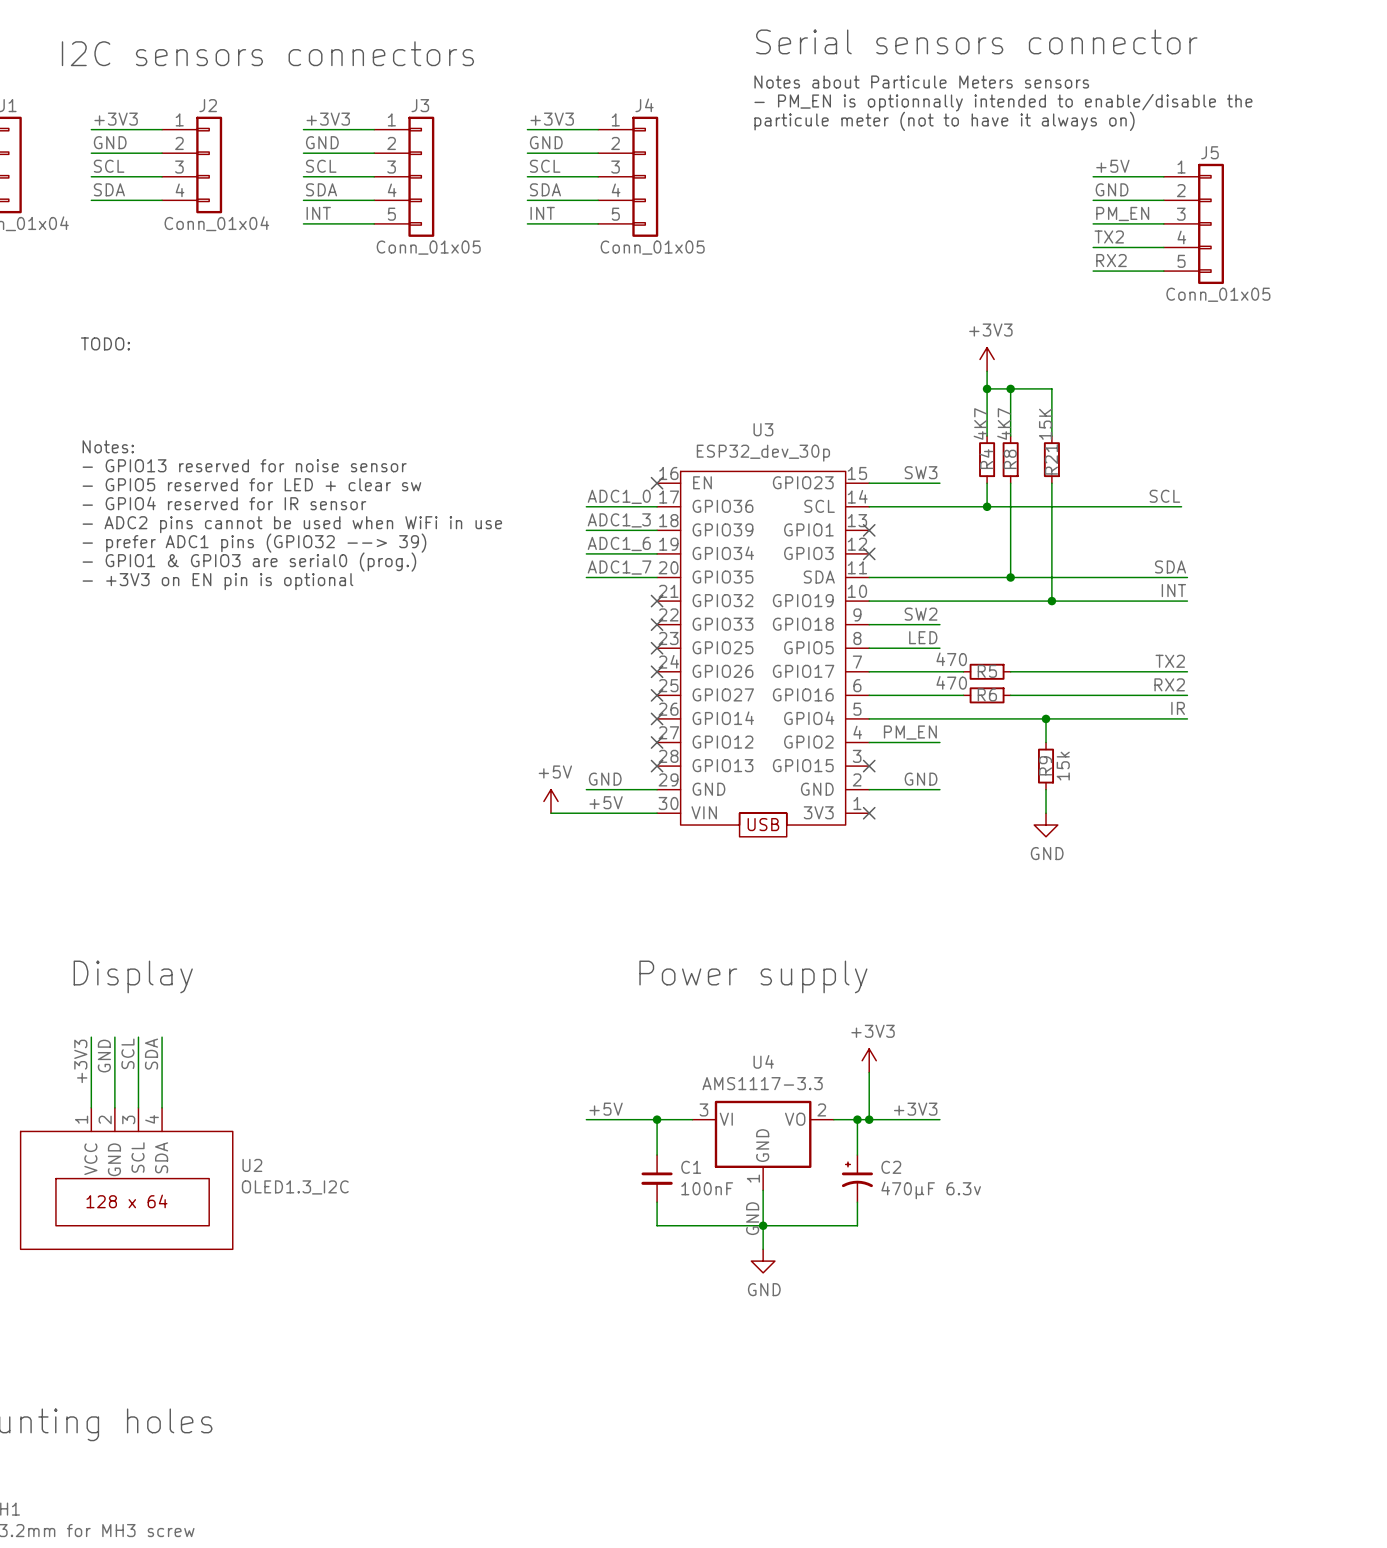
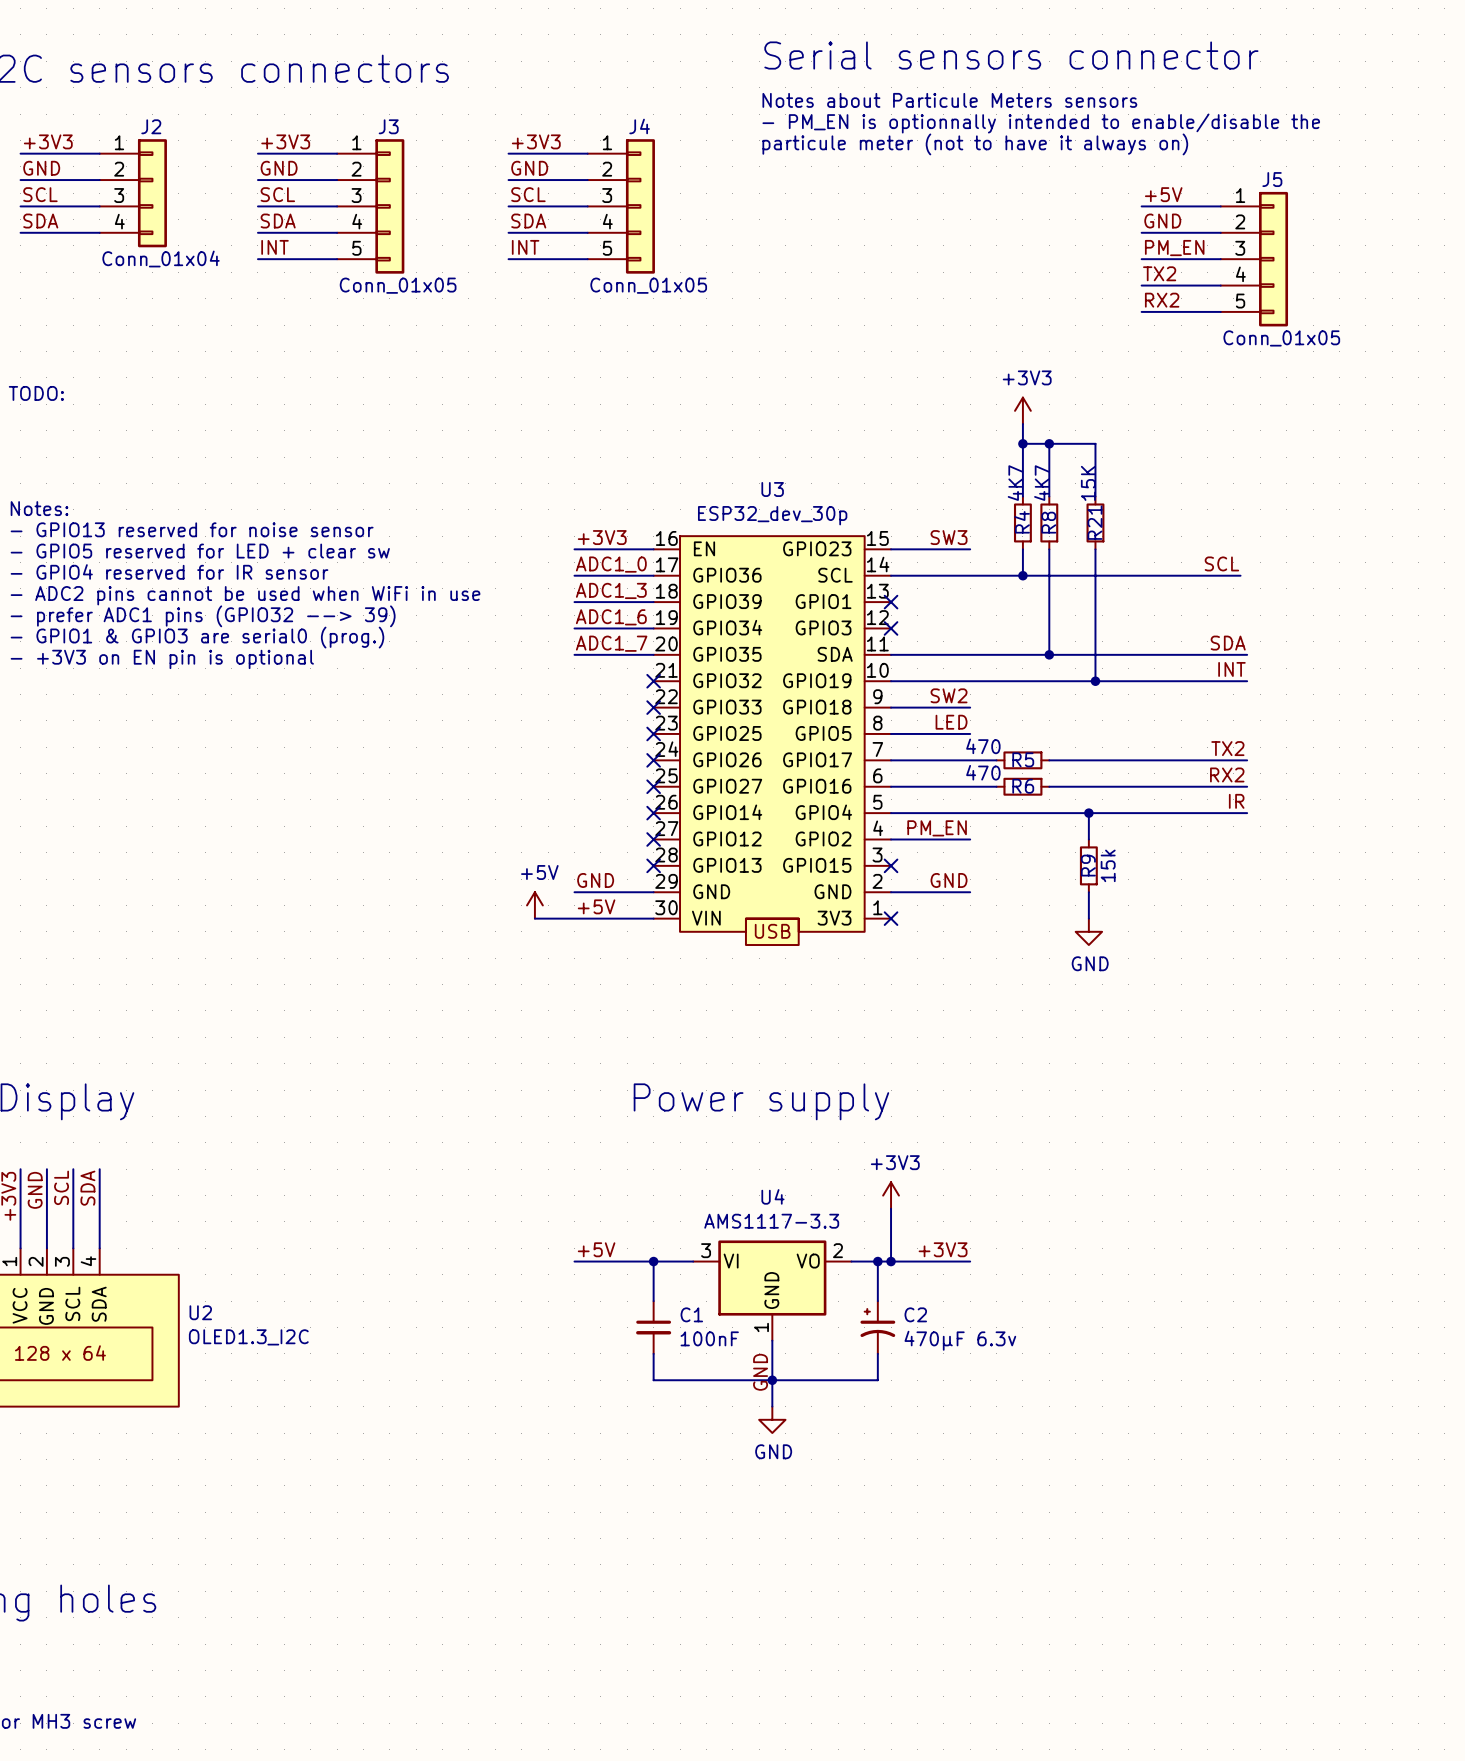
label: none -> +3V3 (602, 537)
wire: none -> (574, 549) (653, 549)
no-connect mark: (657, 483) -> none

